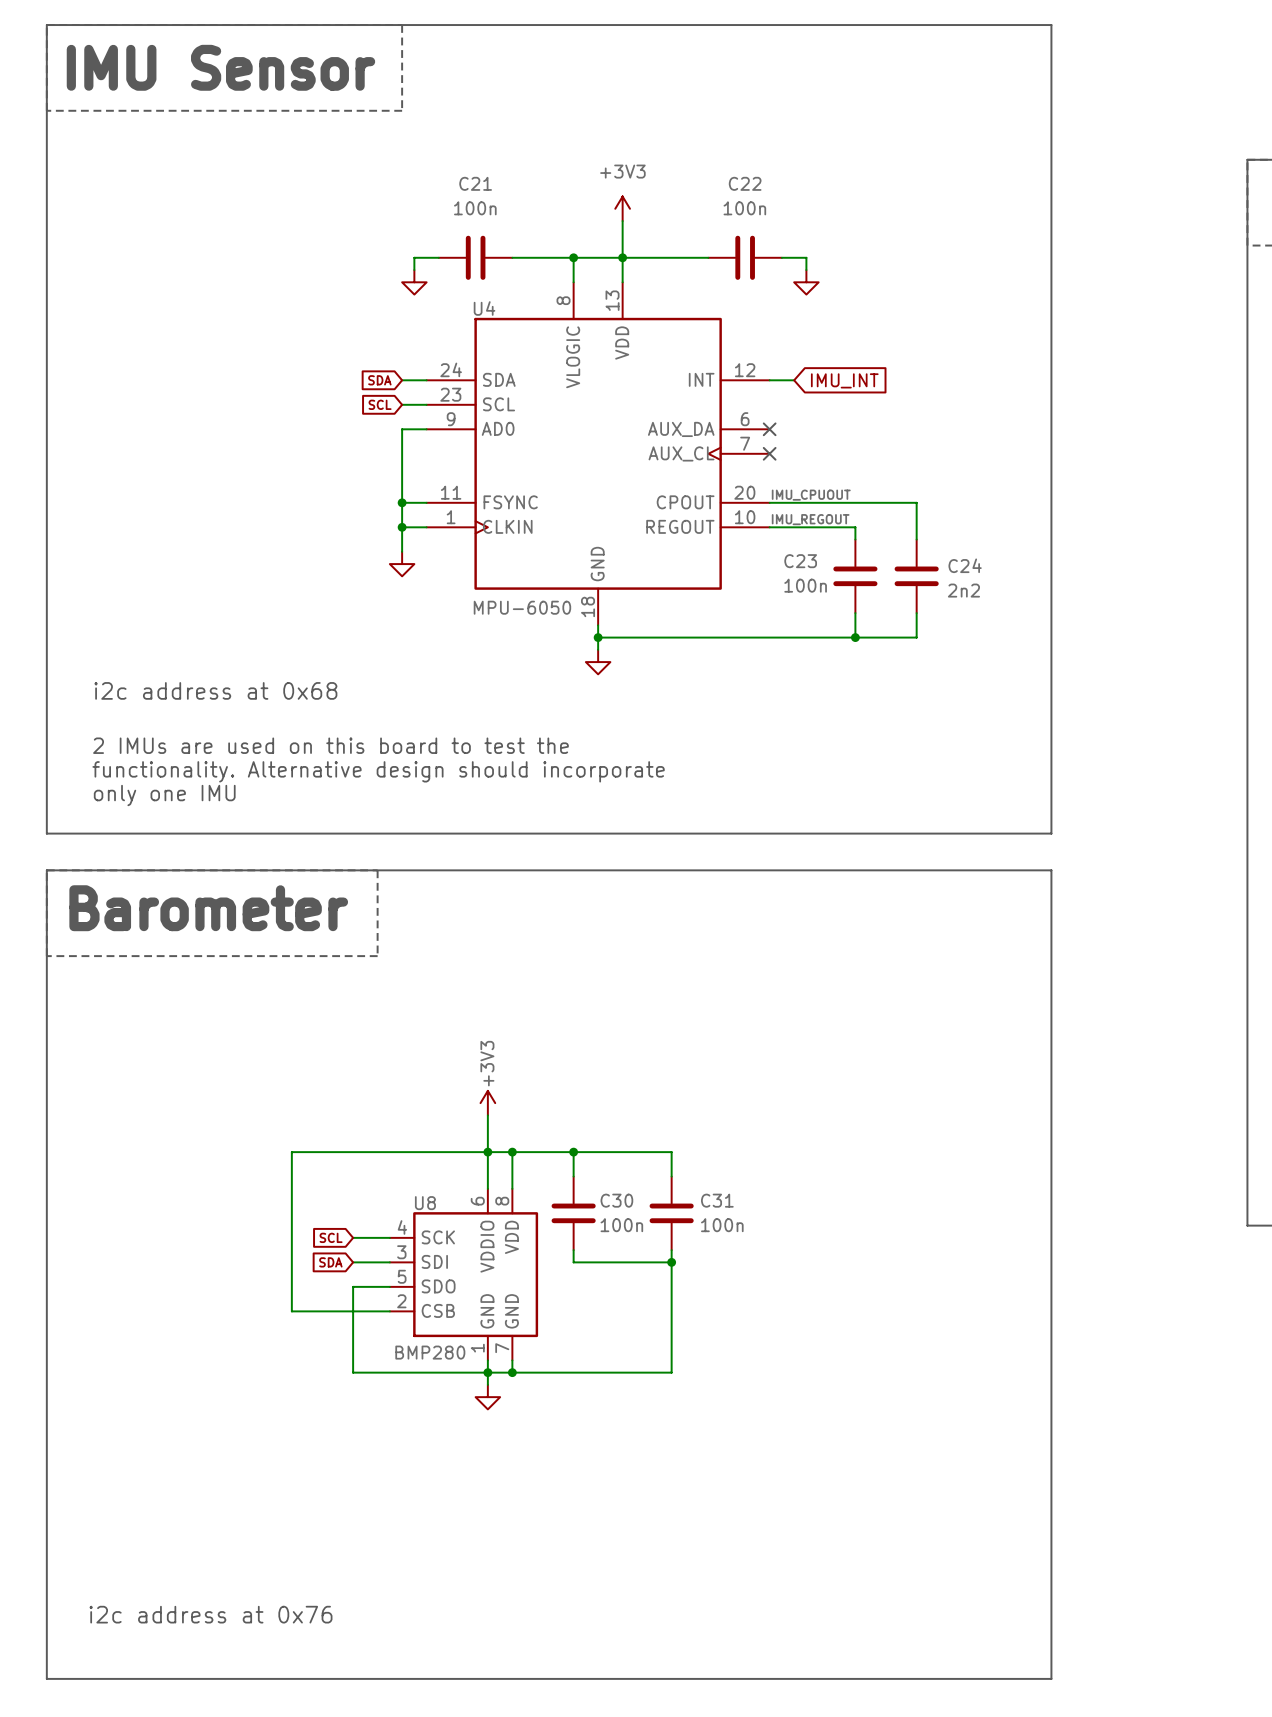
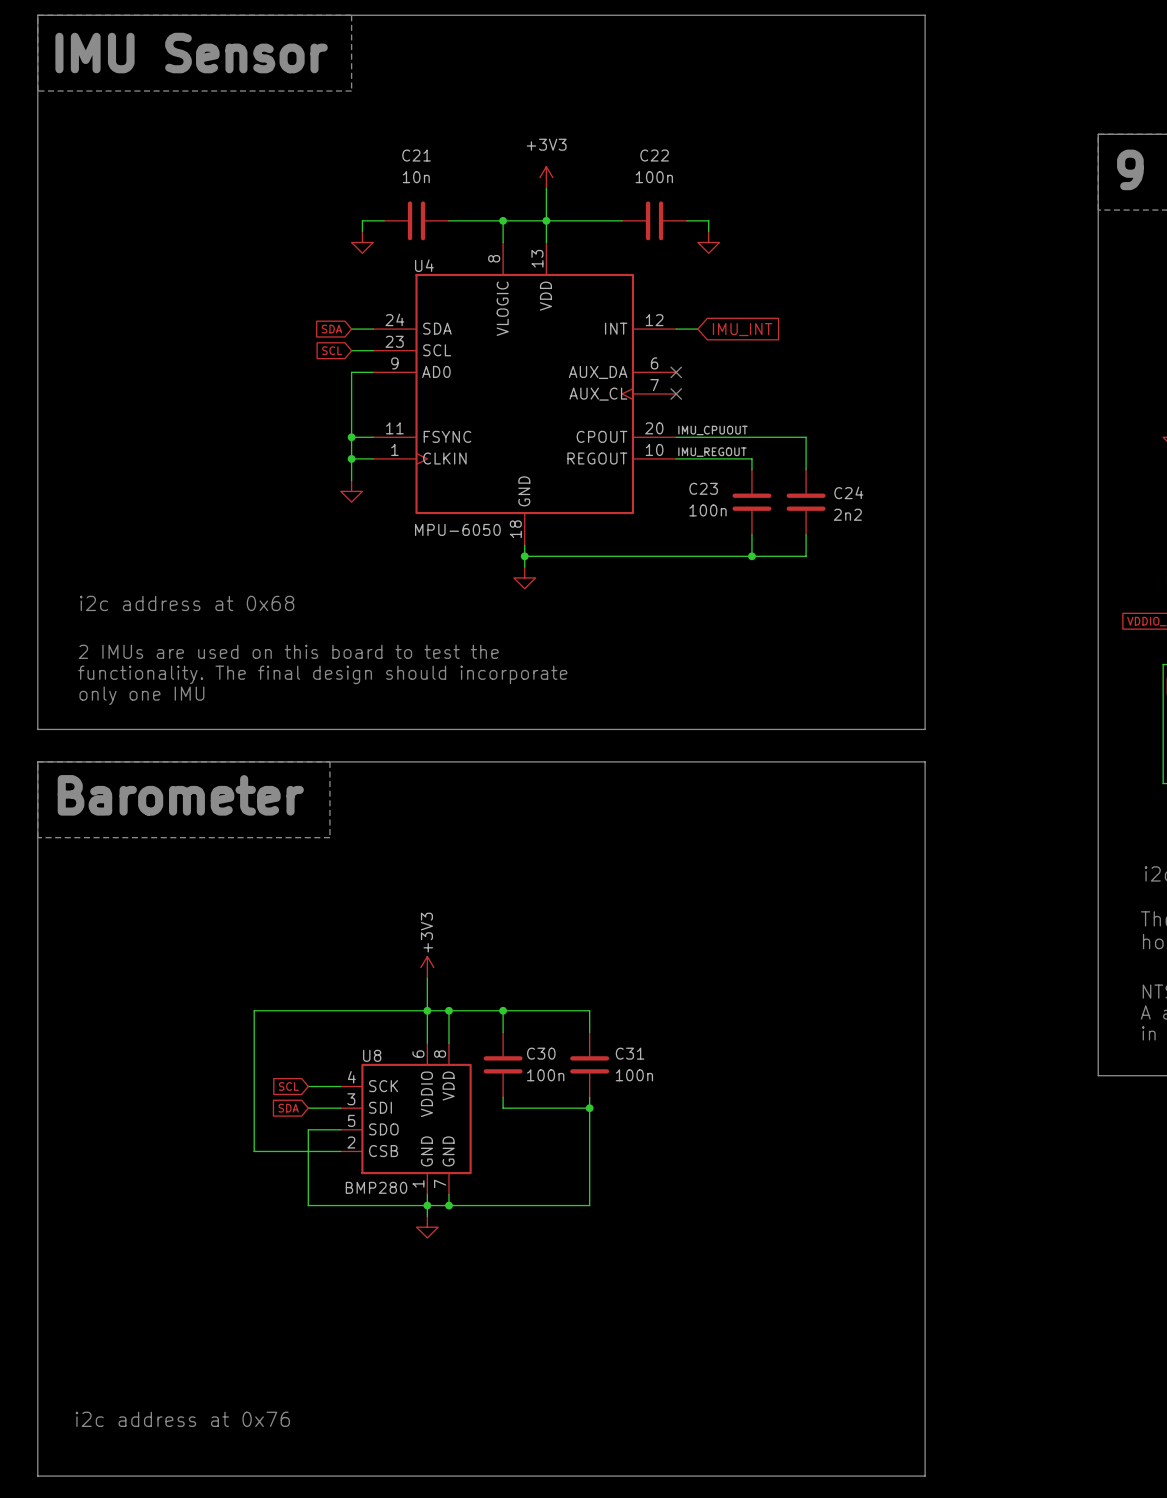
C21 value: 100n (475, 208) -> 10n (416, 177)
text: functionality. Alternative design should incorporate (378, 771) -> functionality. The final design should incorporate (322, 674)

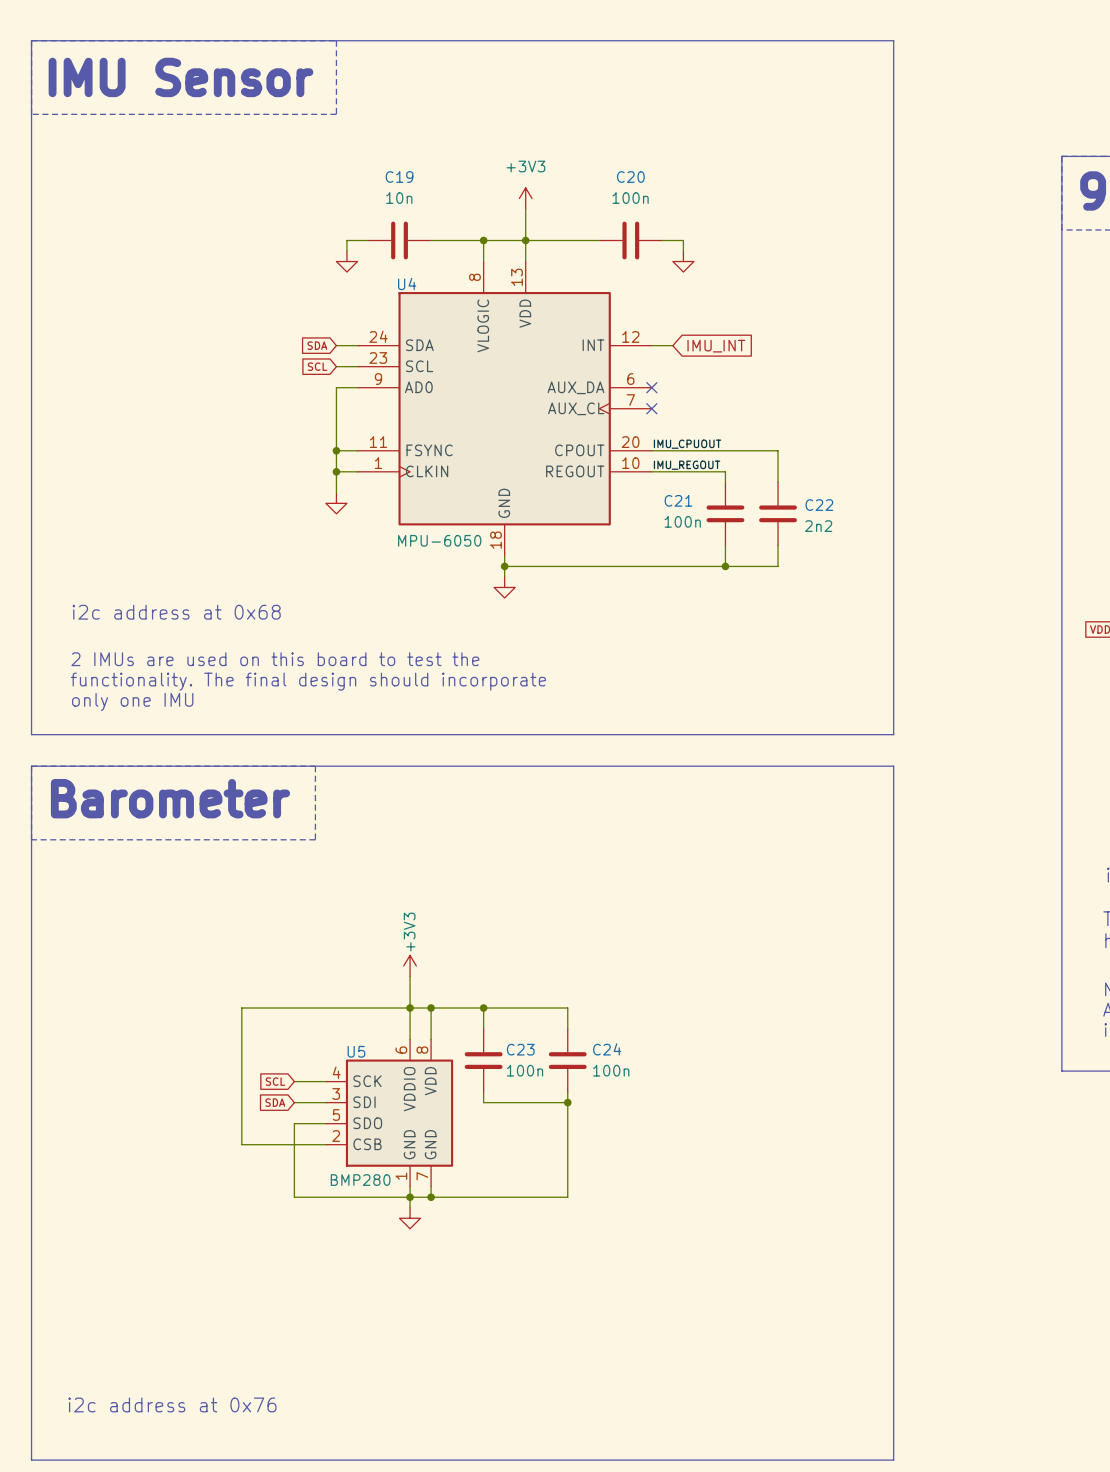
C21 name: C21 (416, 155) -> C19 (399, 177)
C22 name: C22 (654, 155) -> C20 (630, 177)
C23 name: C23 (703, 488) -> C21 (678, 500)
C24 name: C24 (848, 492) -> C22 (819, 505)
C30 name: C30 (541, 1053) -> C23 (520, 1049)
C31 name: C31 (630, 1053) -> C24 (607, 1049)
U8 name: U8 (372, 1055) -> U5 (356, 1051)

